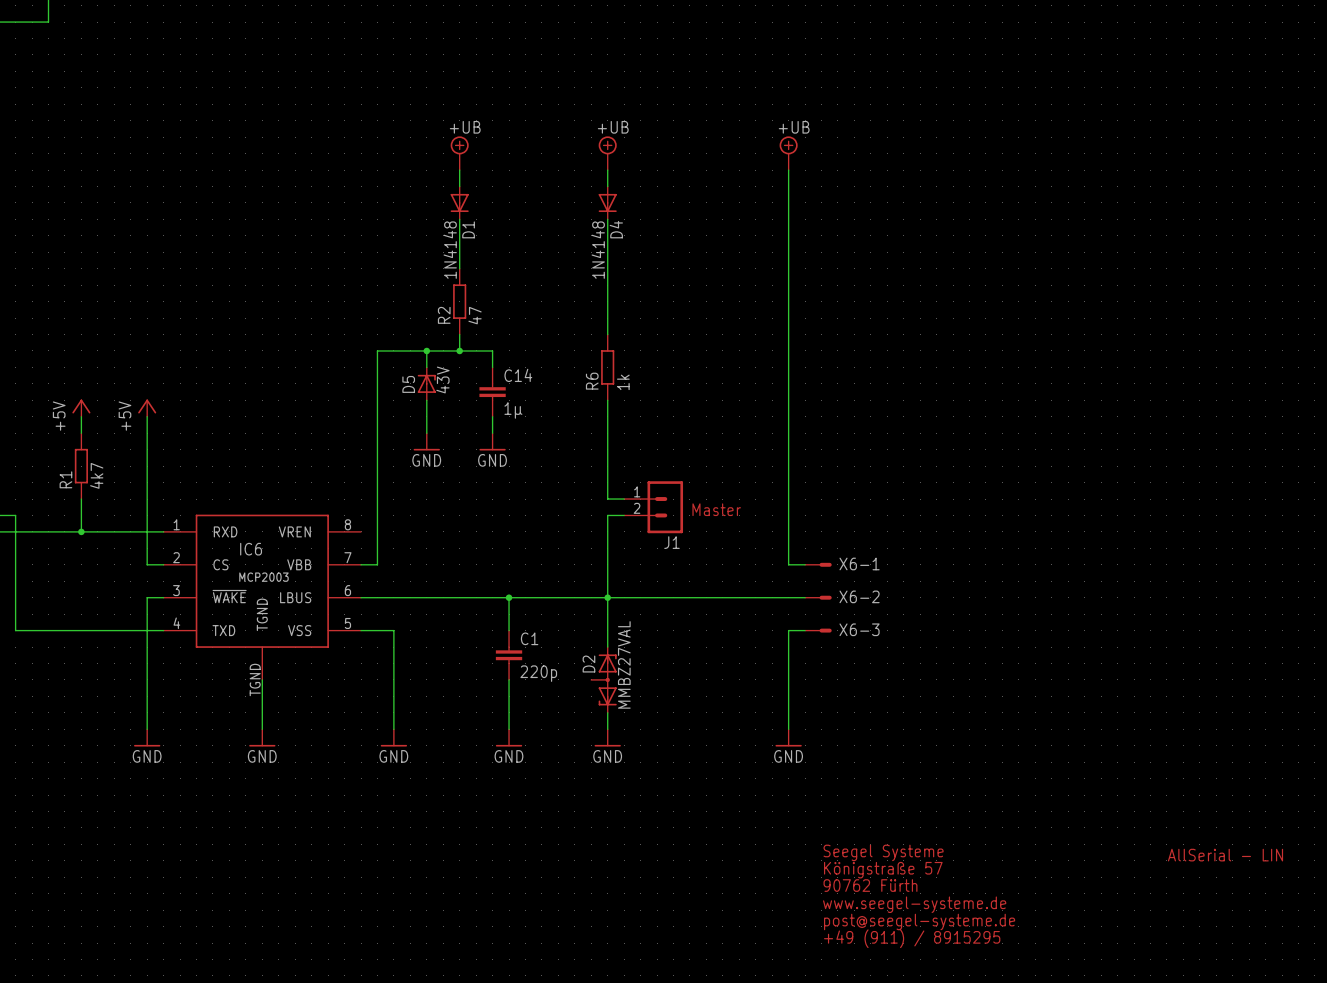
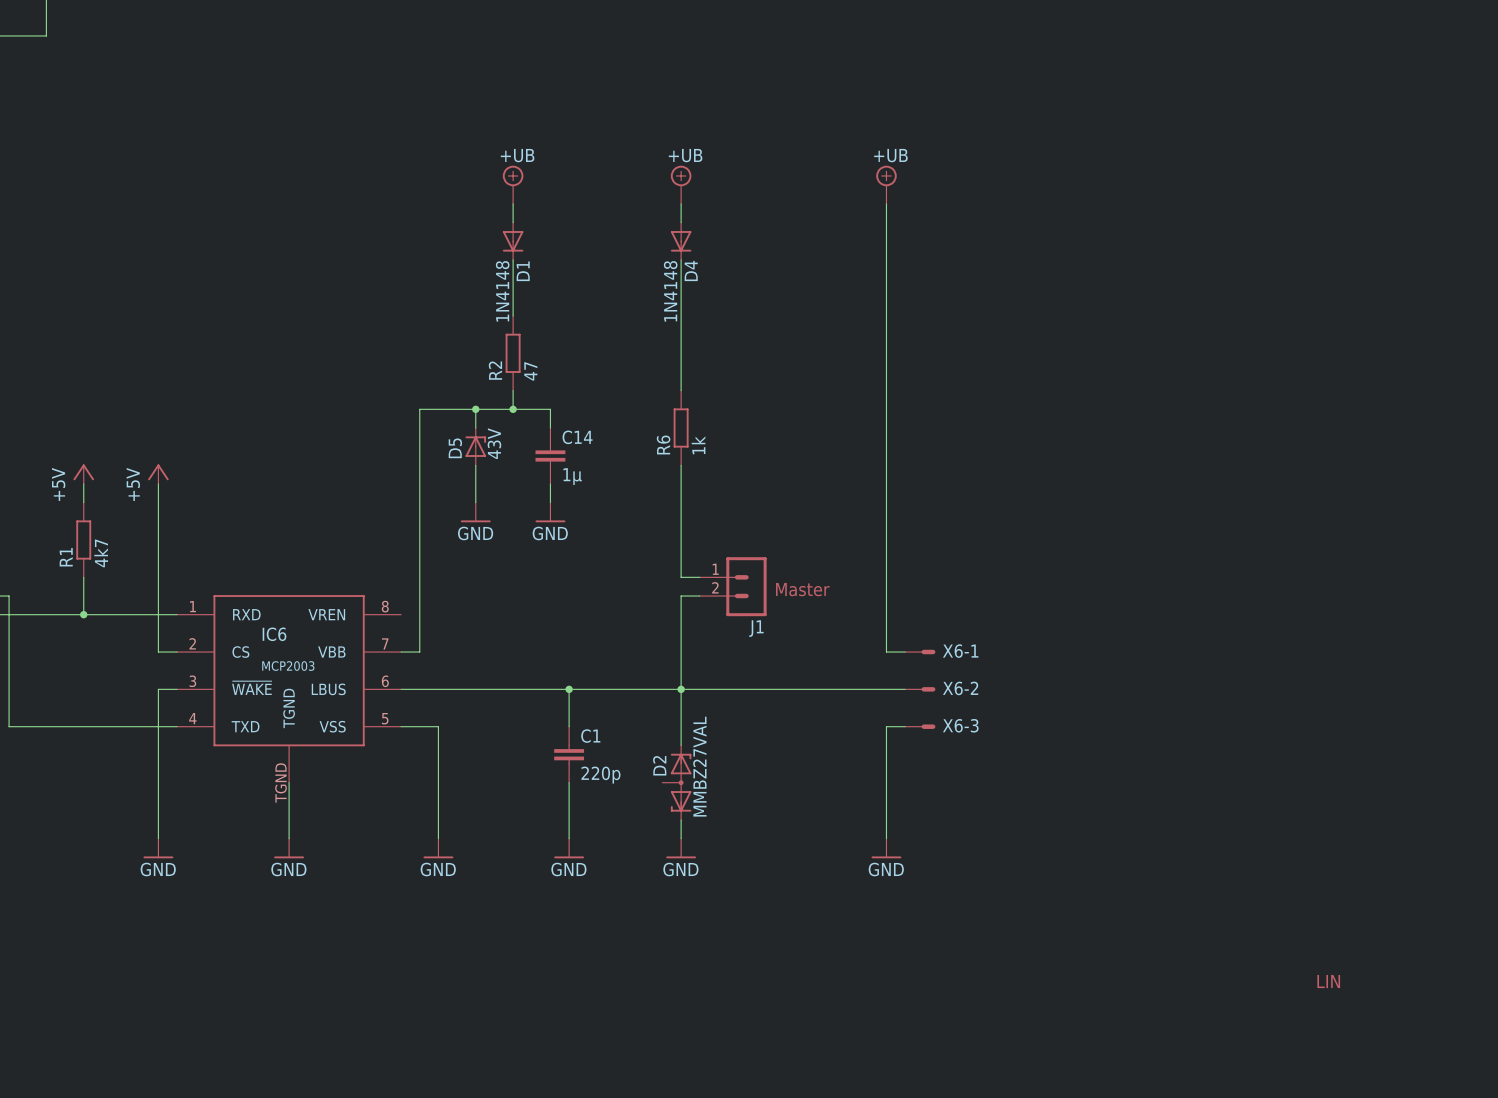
text: Seegel Systeme (883, 852) -> none
text: AllSerial - LIN (1225, 855) -> LIN (1328, 981)
text: Königstraße 57 (883, 870) -> none
text: 90762 Fürth (870, 885) -> none
text: www.seegel-systeme.de (914, 904) -> none
text: post@seegel-systeme.de (919, 921) -> none
text: +49 (911) / 8915295 (912, 938) -> none

